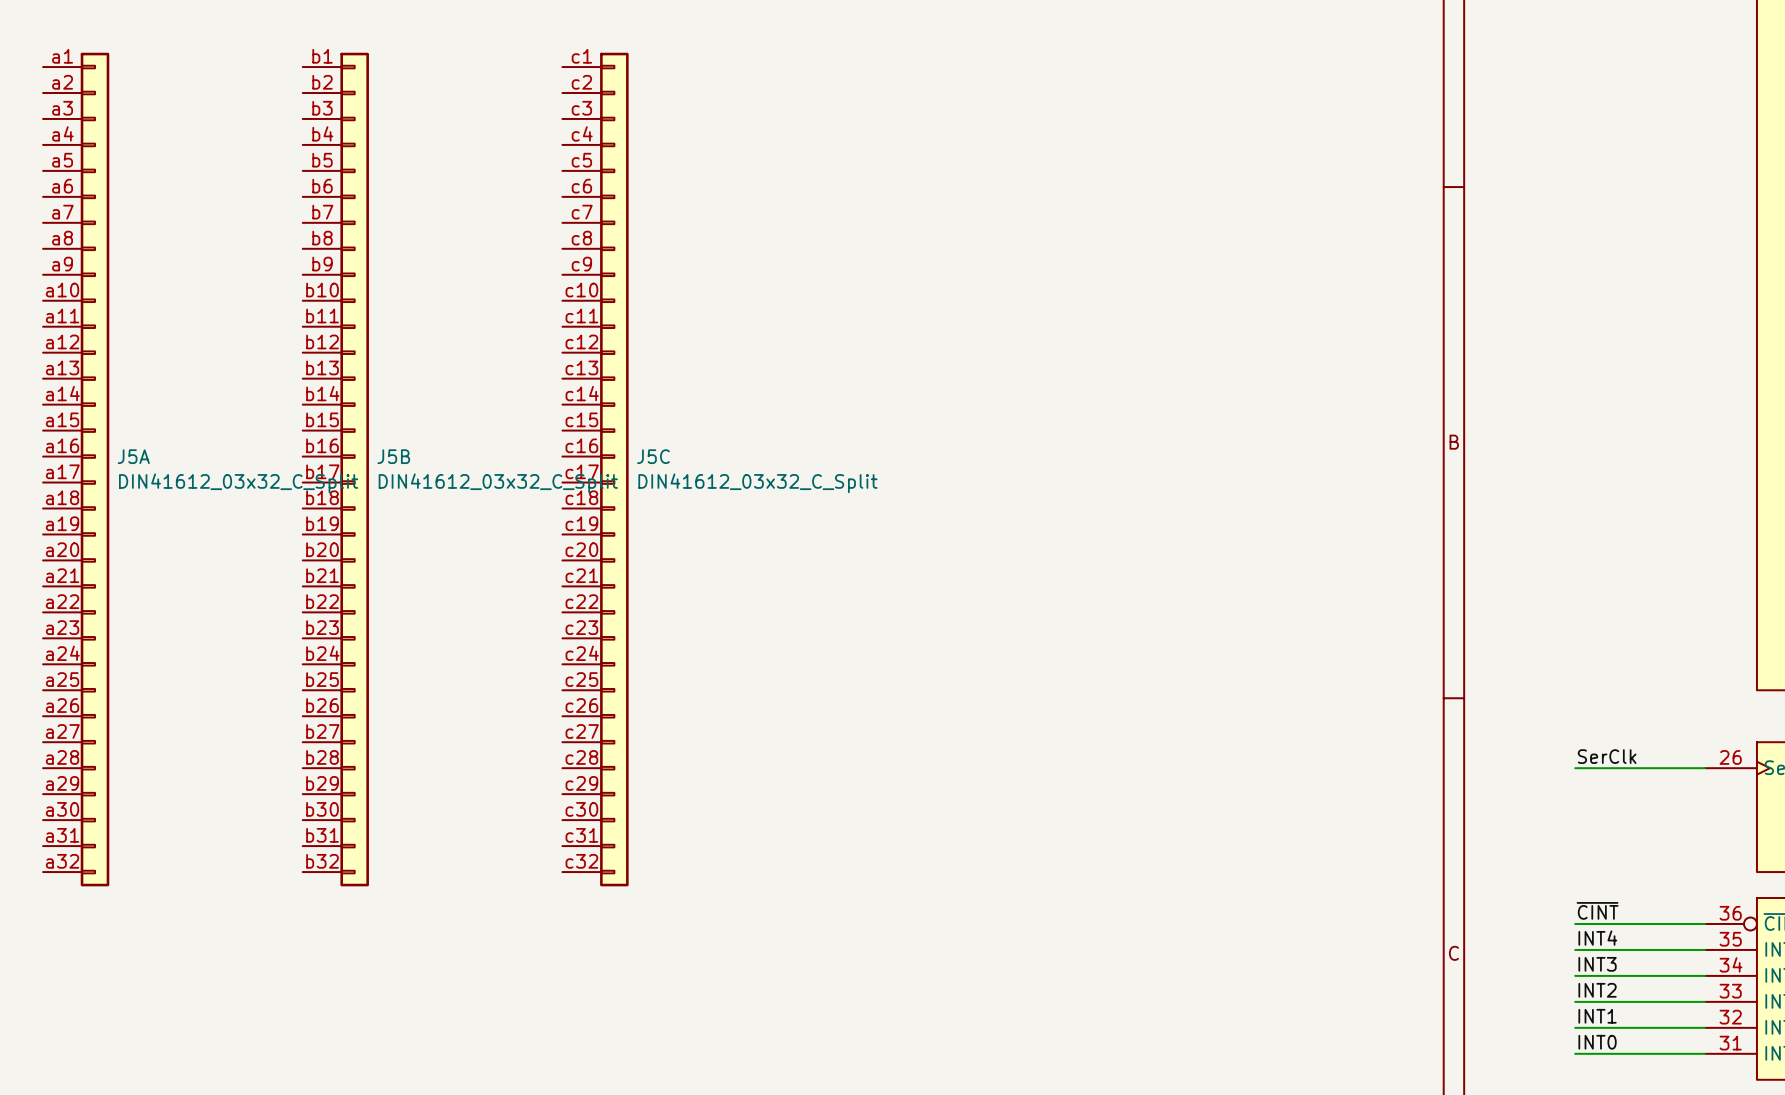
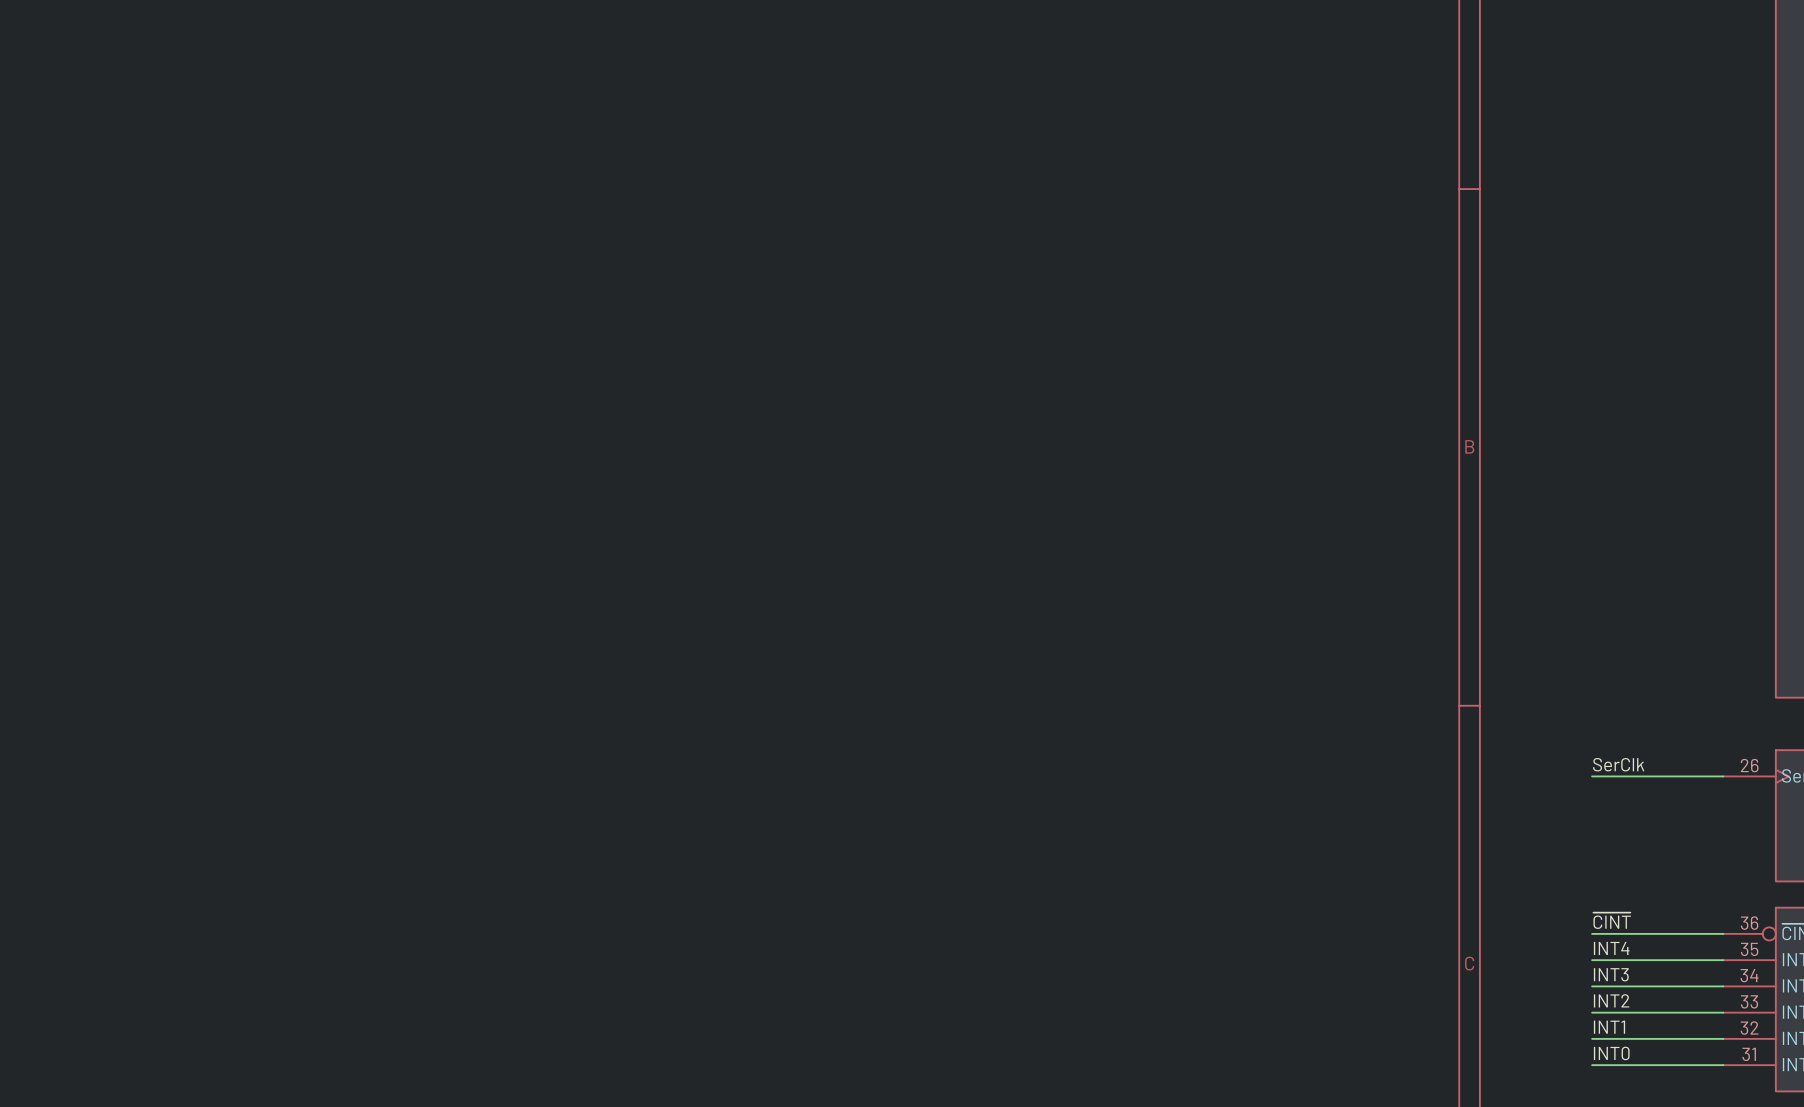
J5A: DIN41612_03x32_C_Split (76, 469) -> none
J5B: DIN41612_03x32_C_Split (335, 469) -> none
J5C: DIN41612_03x32_C_Split (595, 469) -> none

